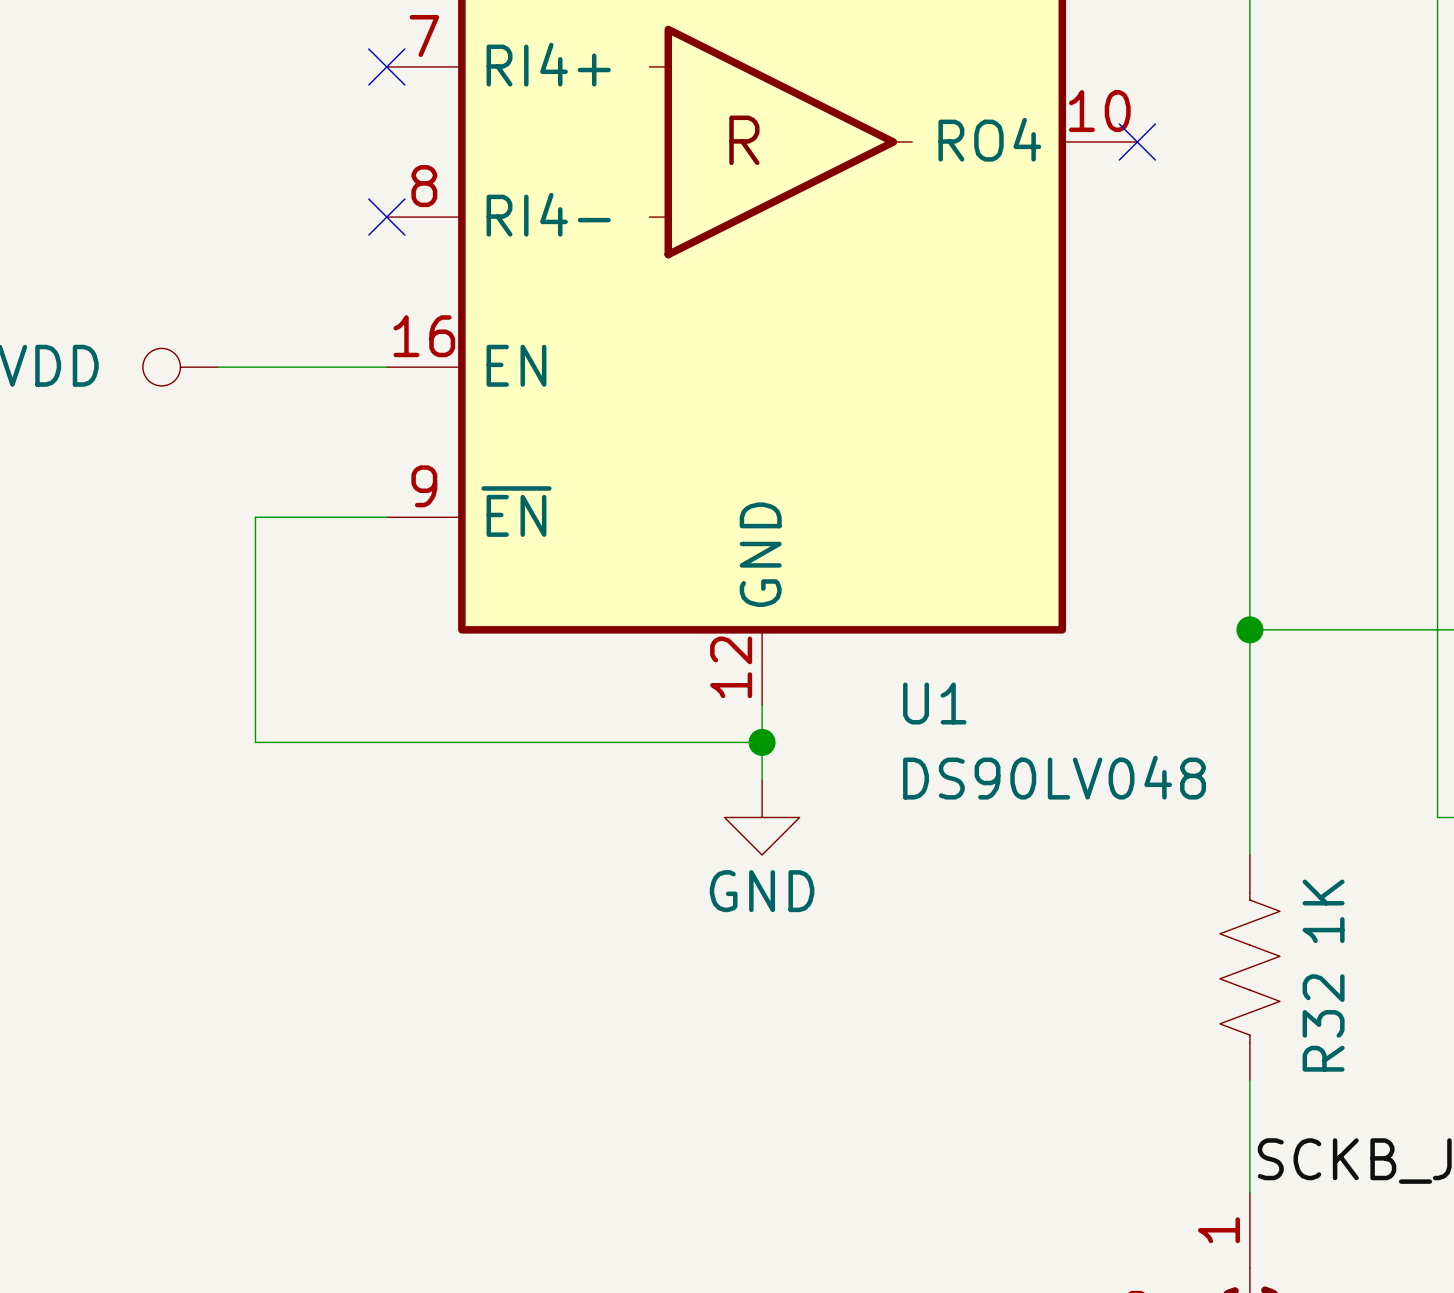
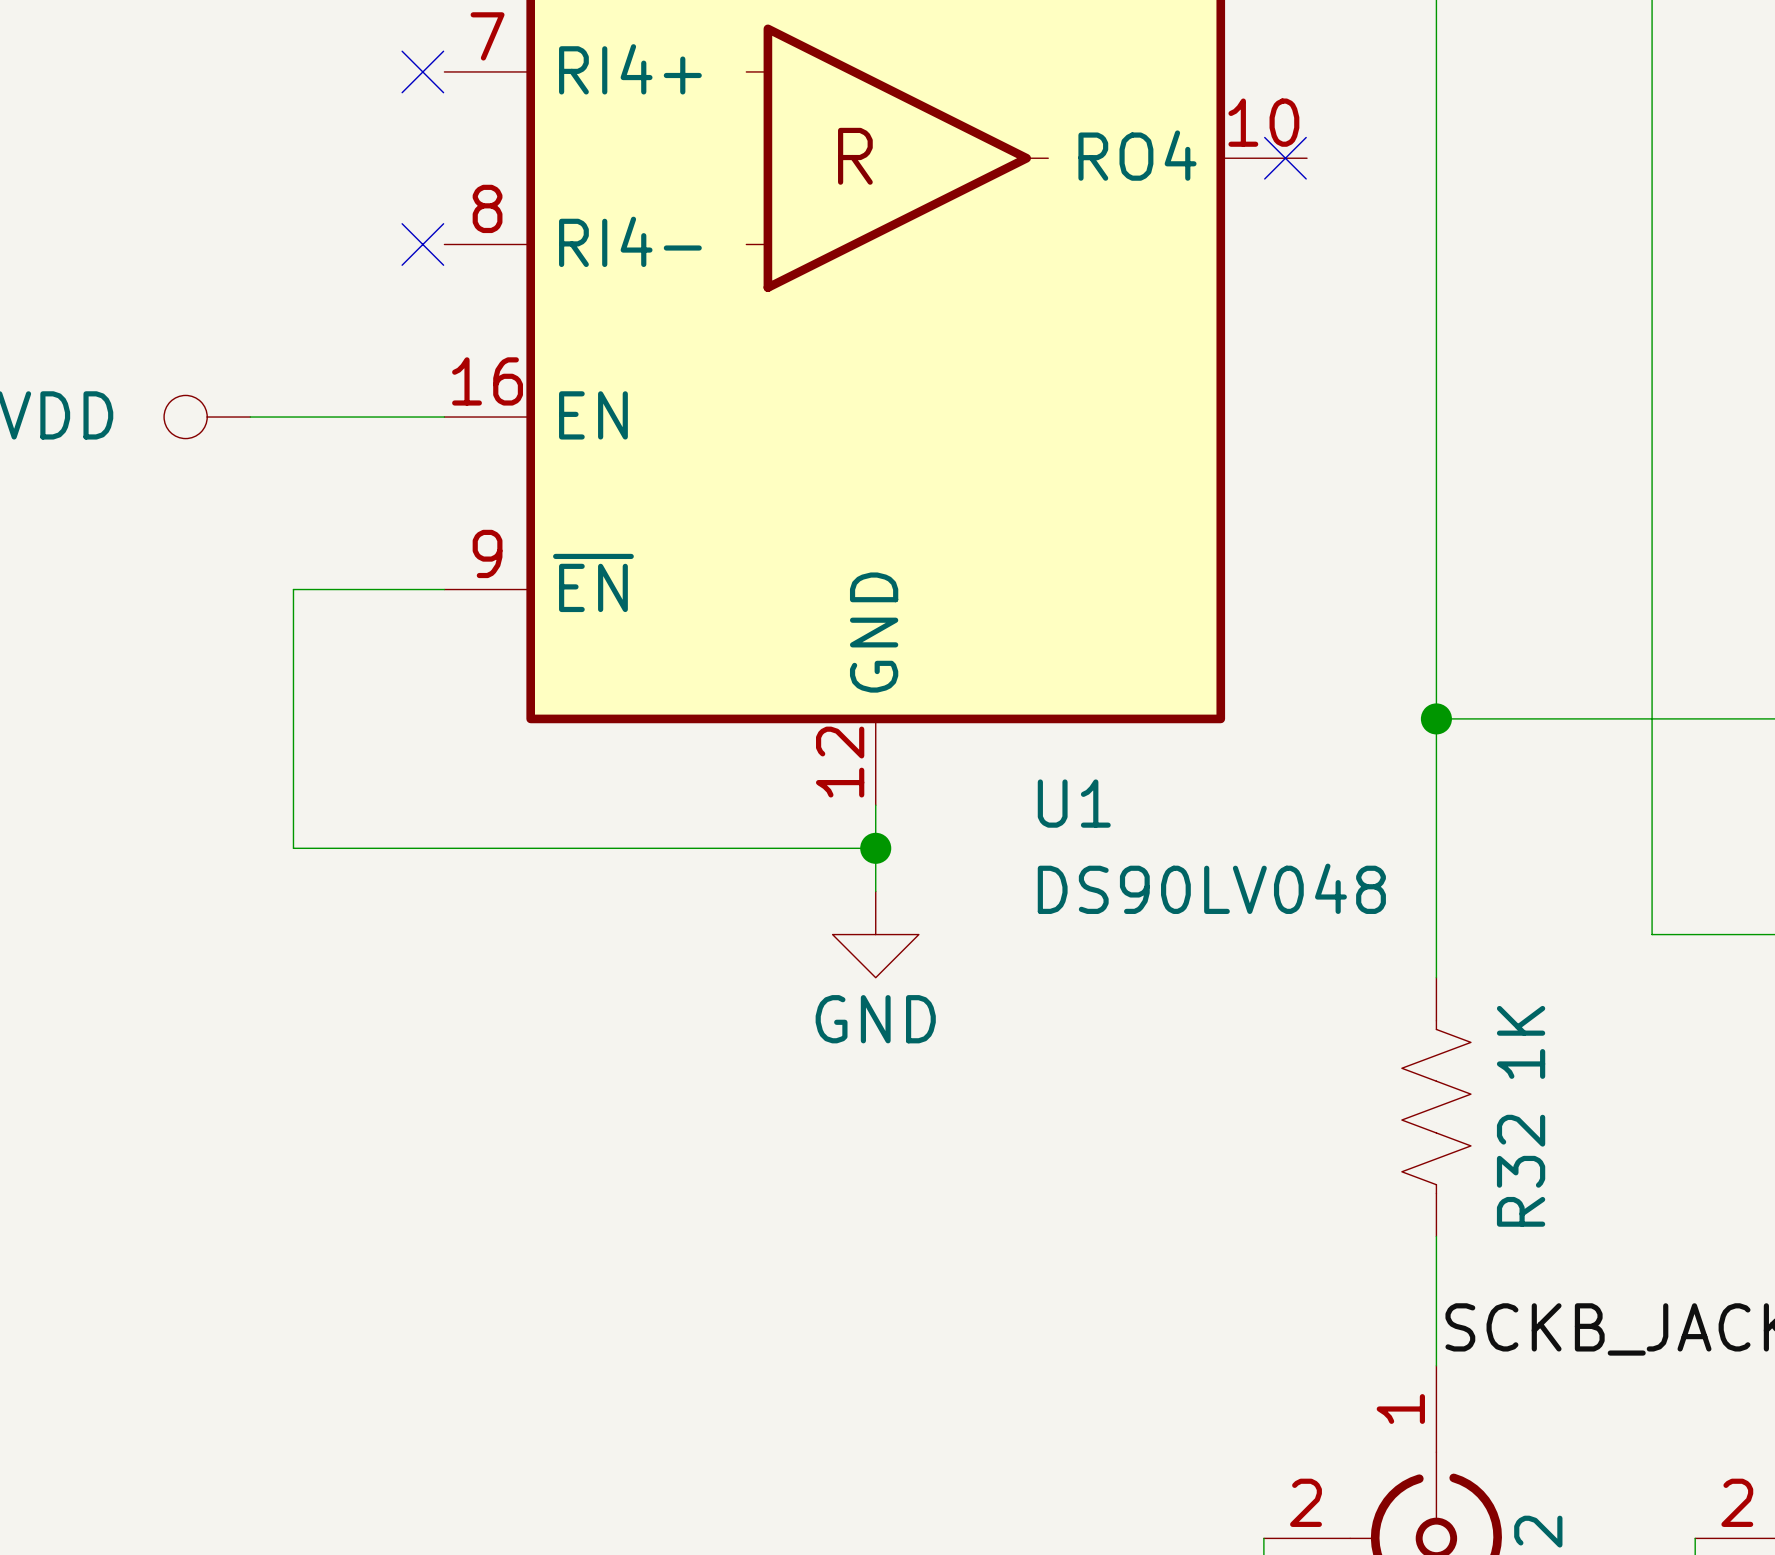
no-connect mark position: (386, 66) -> (422, 71)
no-connect mark position: (1137, 142) -> (1285, 158)
no-connect mark position: (386, 217) -> (422, 244)

